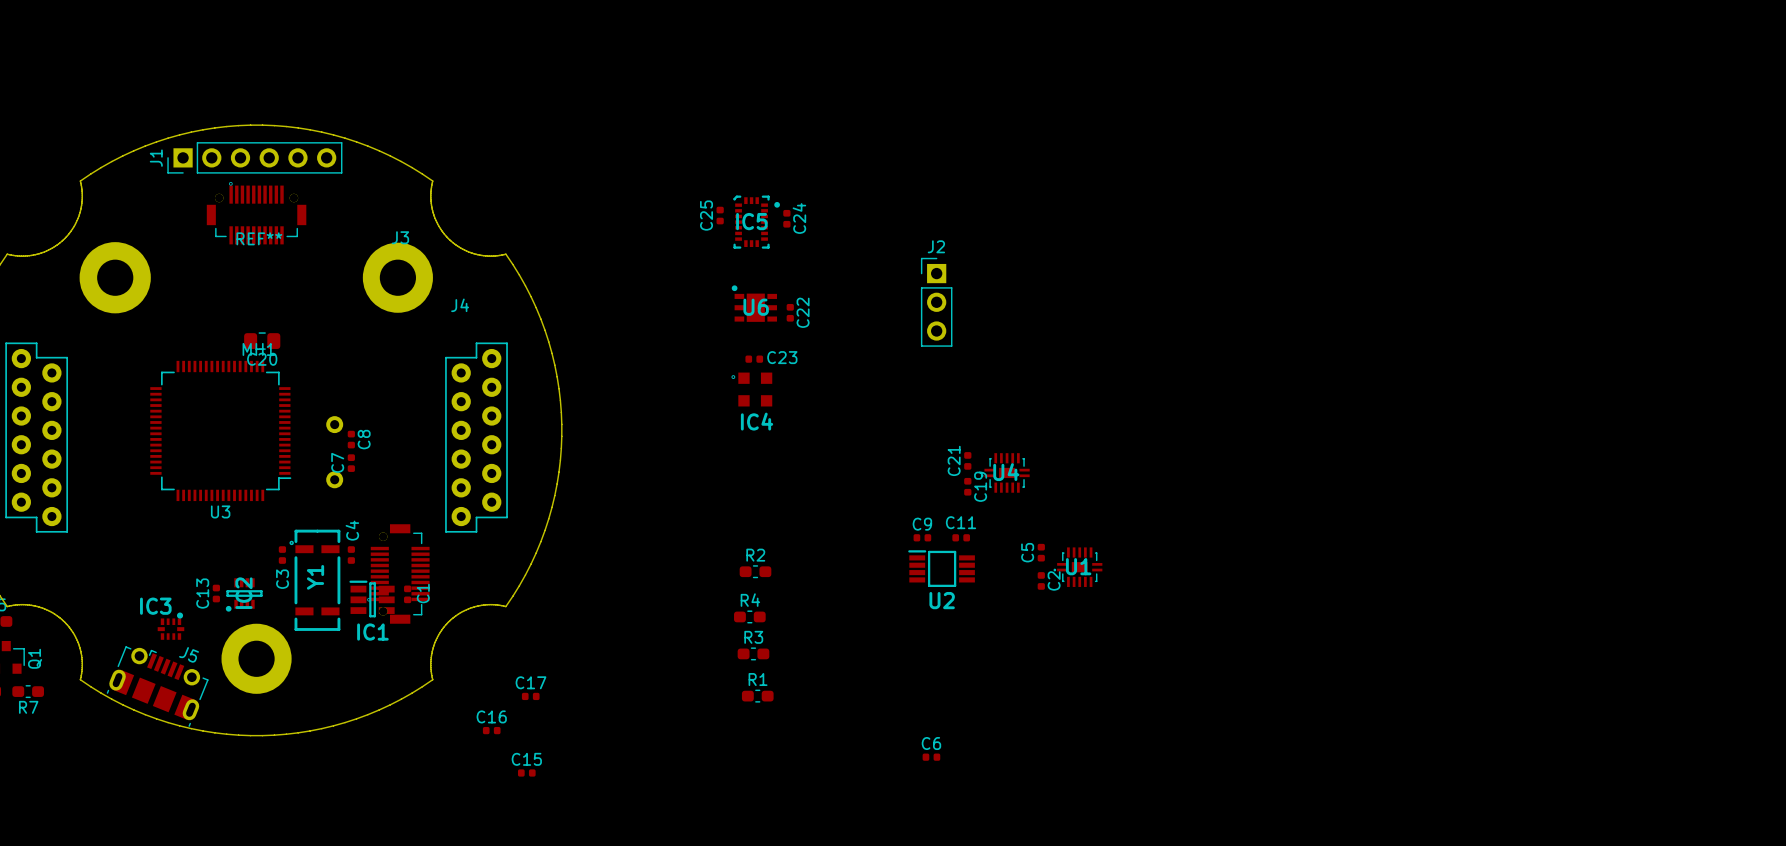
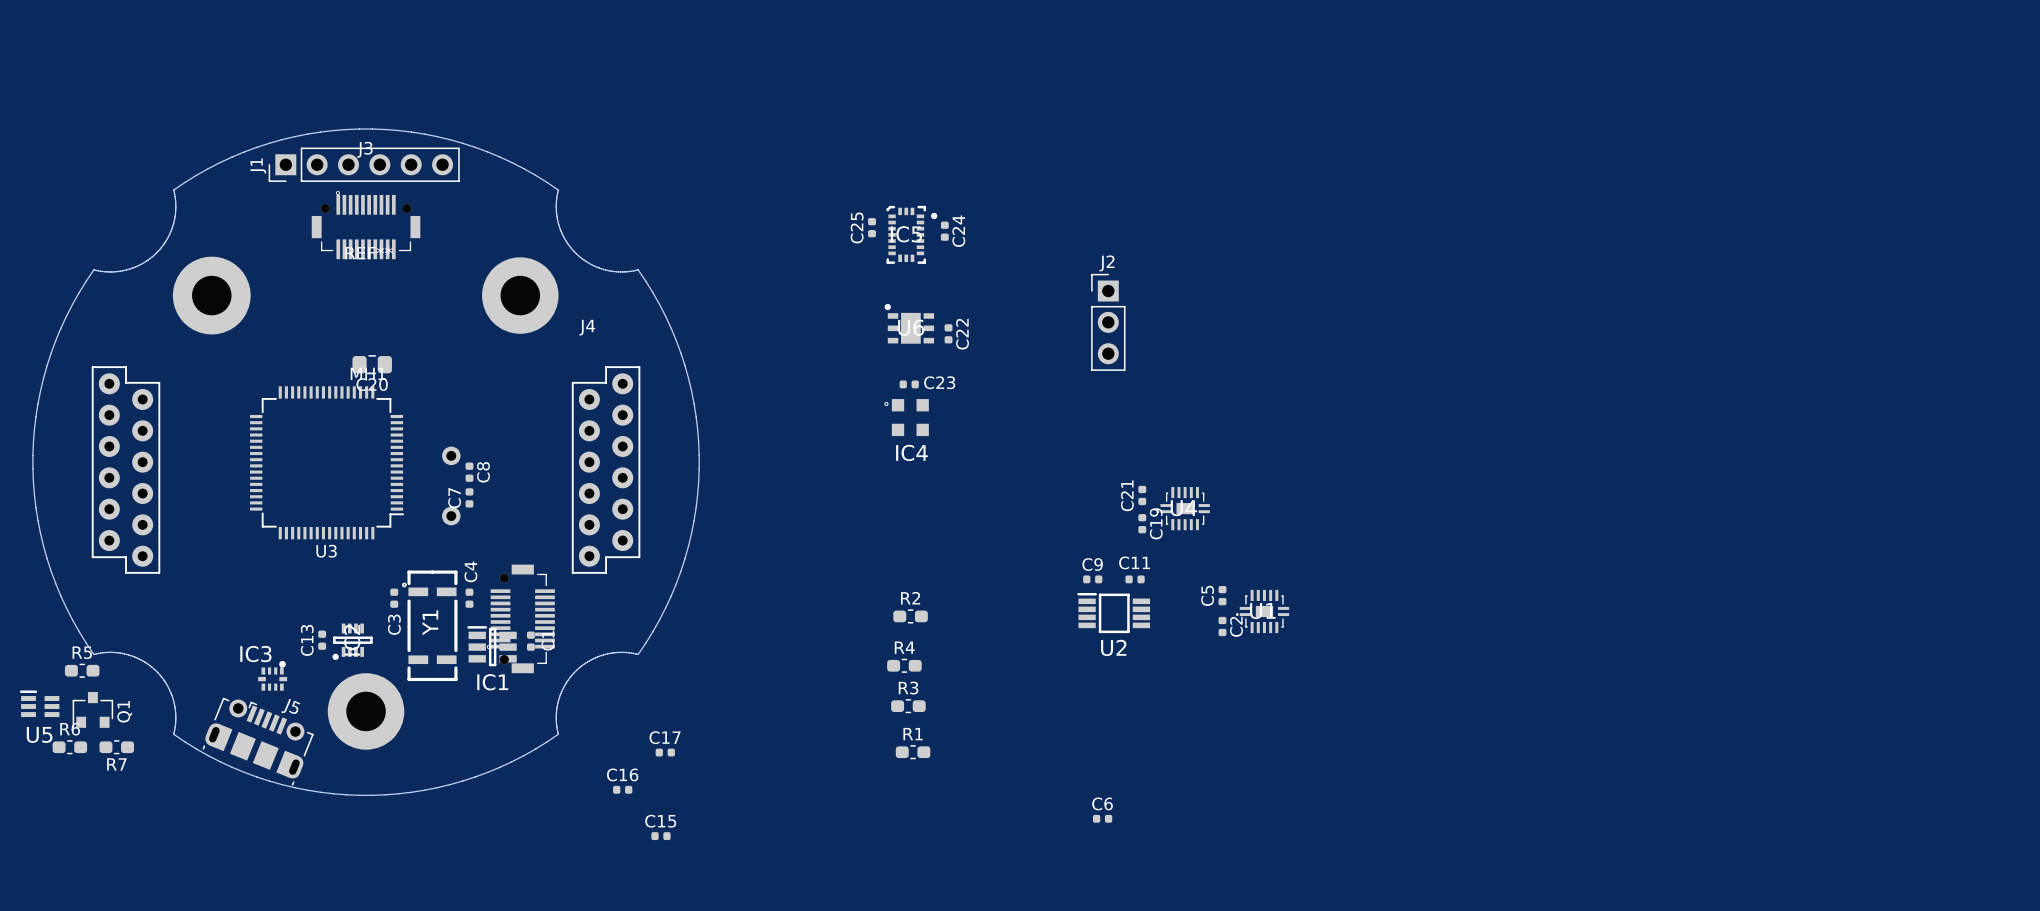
J3 name position: J3 (400, 237) -> J3 (364, 149)

